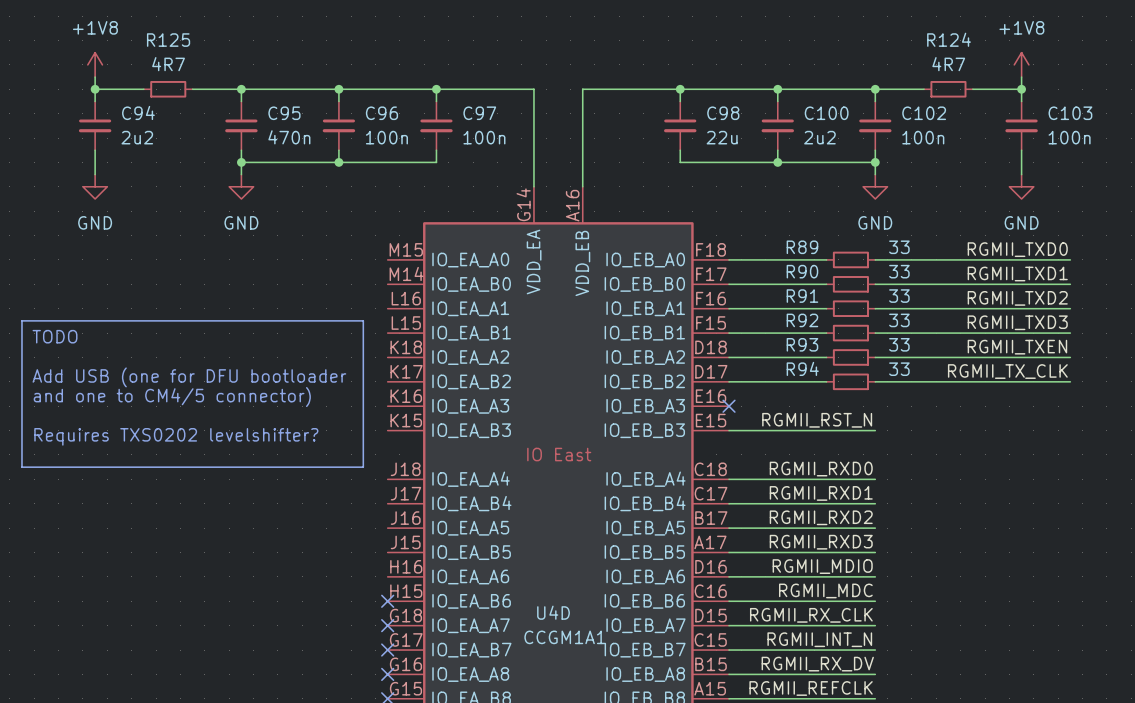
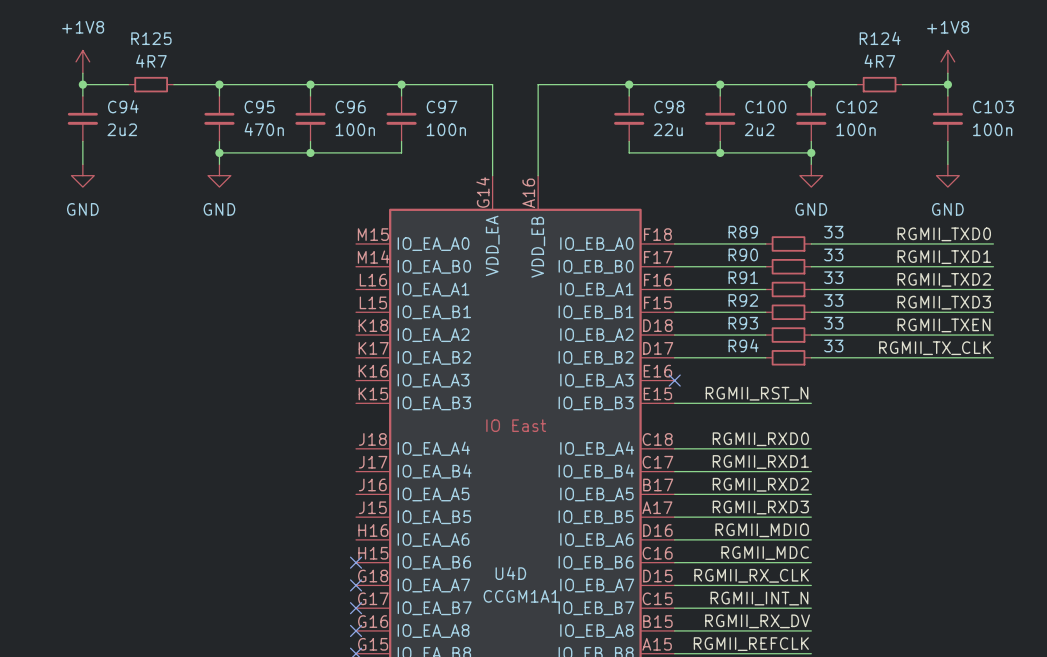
line: (21, 320) (363, 320) (363, 467) (21, 467) (21, 320) -> none
text: TODO (55, 336) -> none
text: Add USB (one for DFU bootloader (189, 377) -> none
text: and one to CM4/5 connector) (172, 397) -> none
text: Requires TXS0202 levelshifter? (176, 436) -> none

